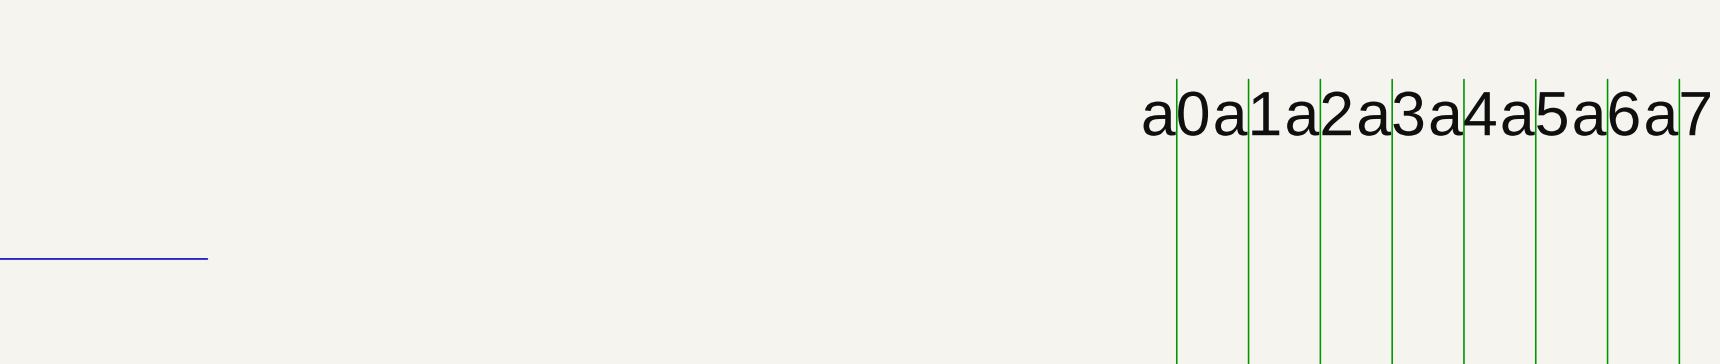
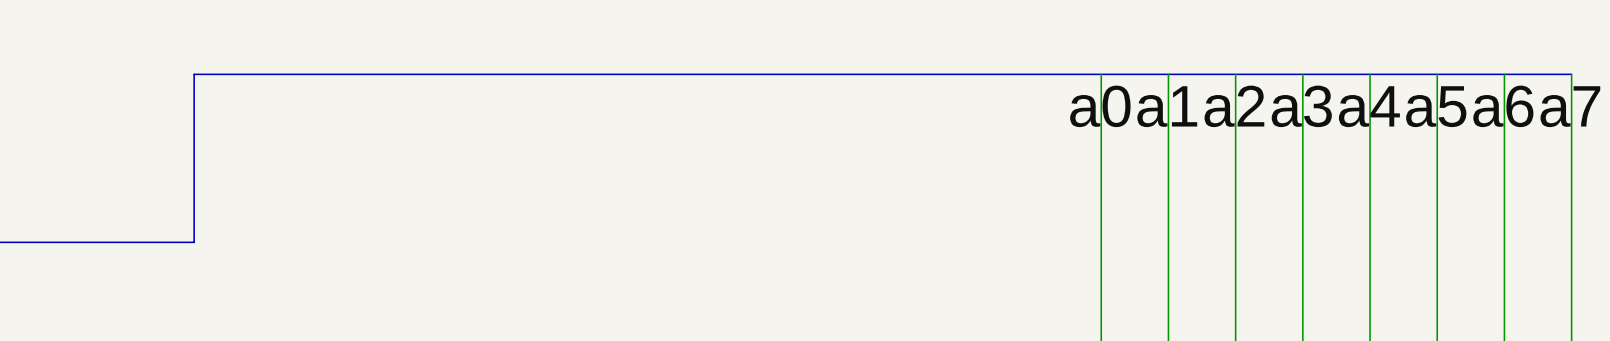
bus: none -> (1571, 74) (194, 74) (194, 242)

